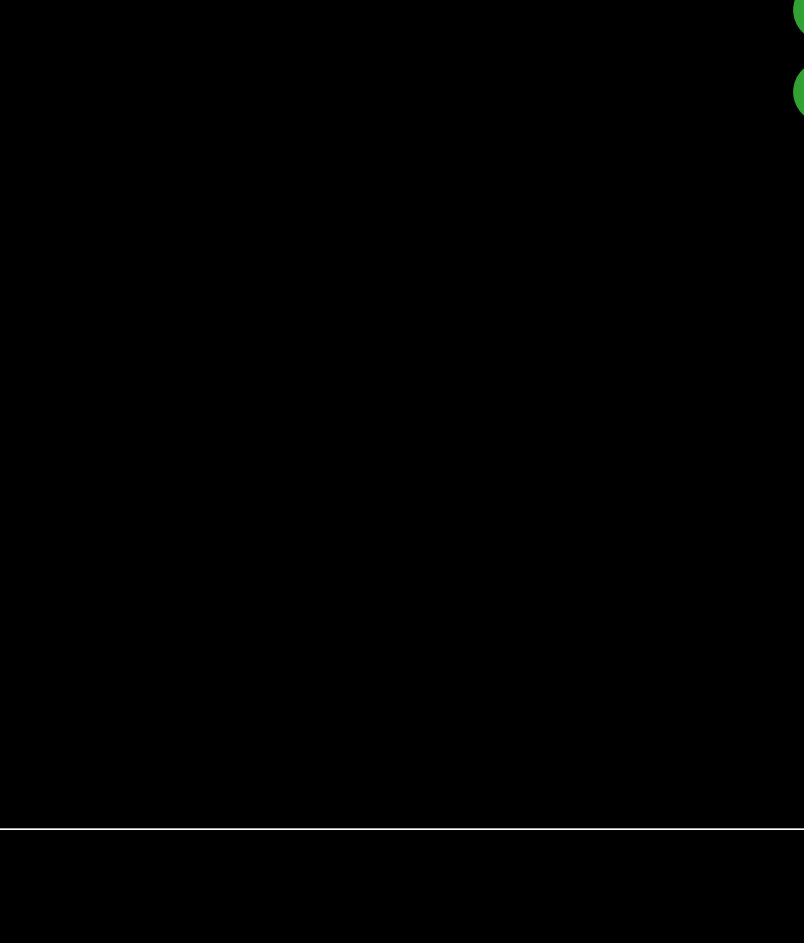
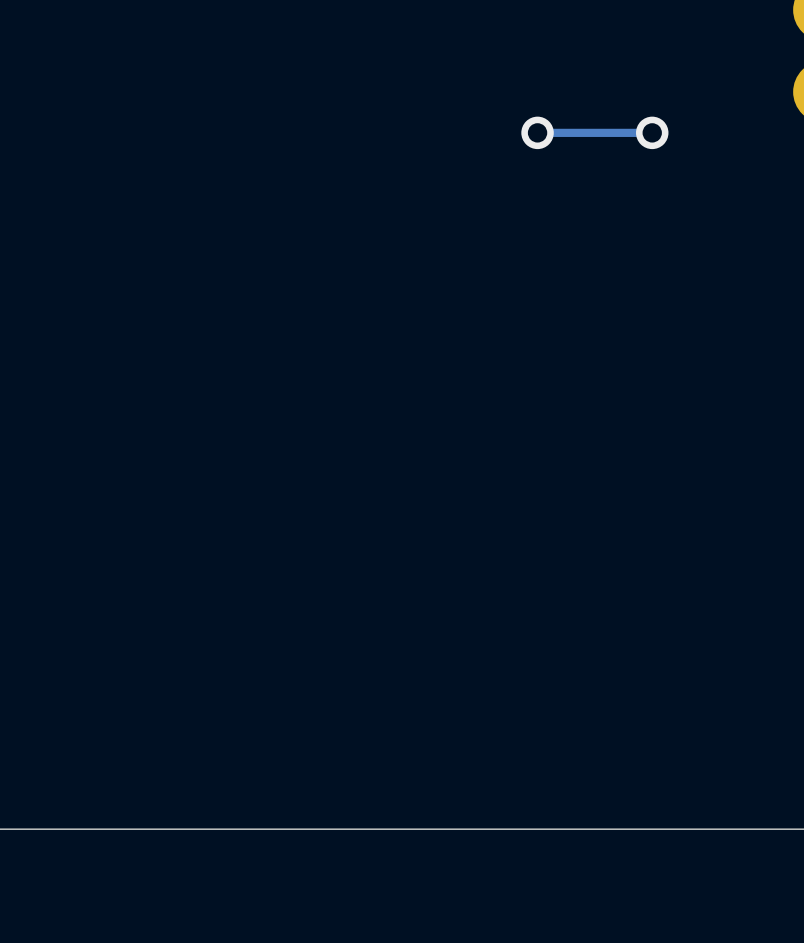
via: none -> (537, 132)
track: none -> (652, 132) (537, 132)
via: none -> (652, 132)

